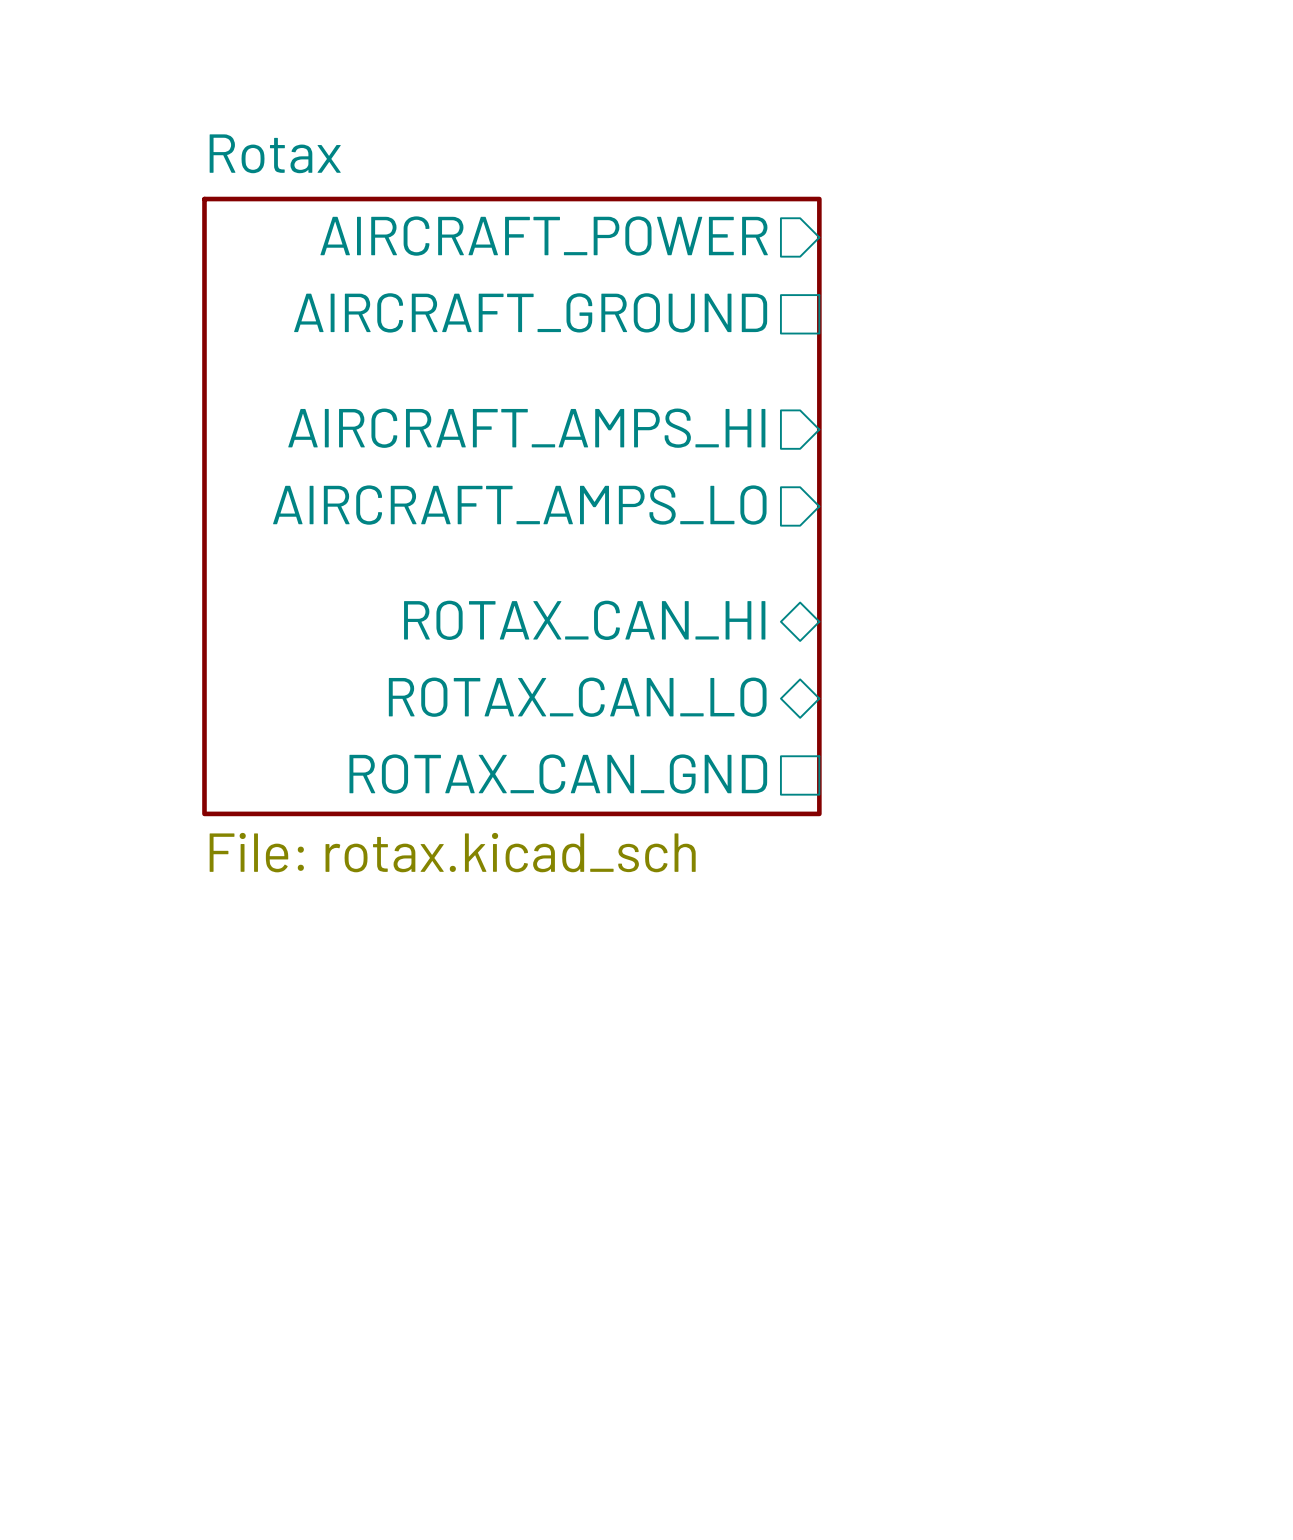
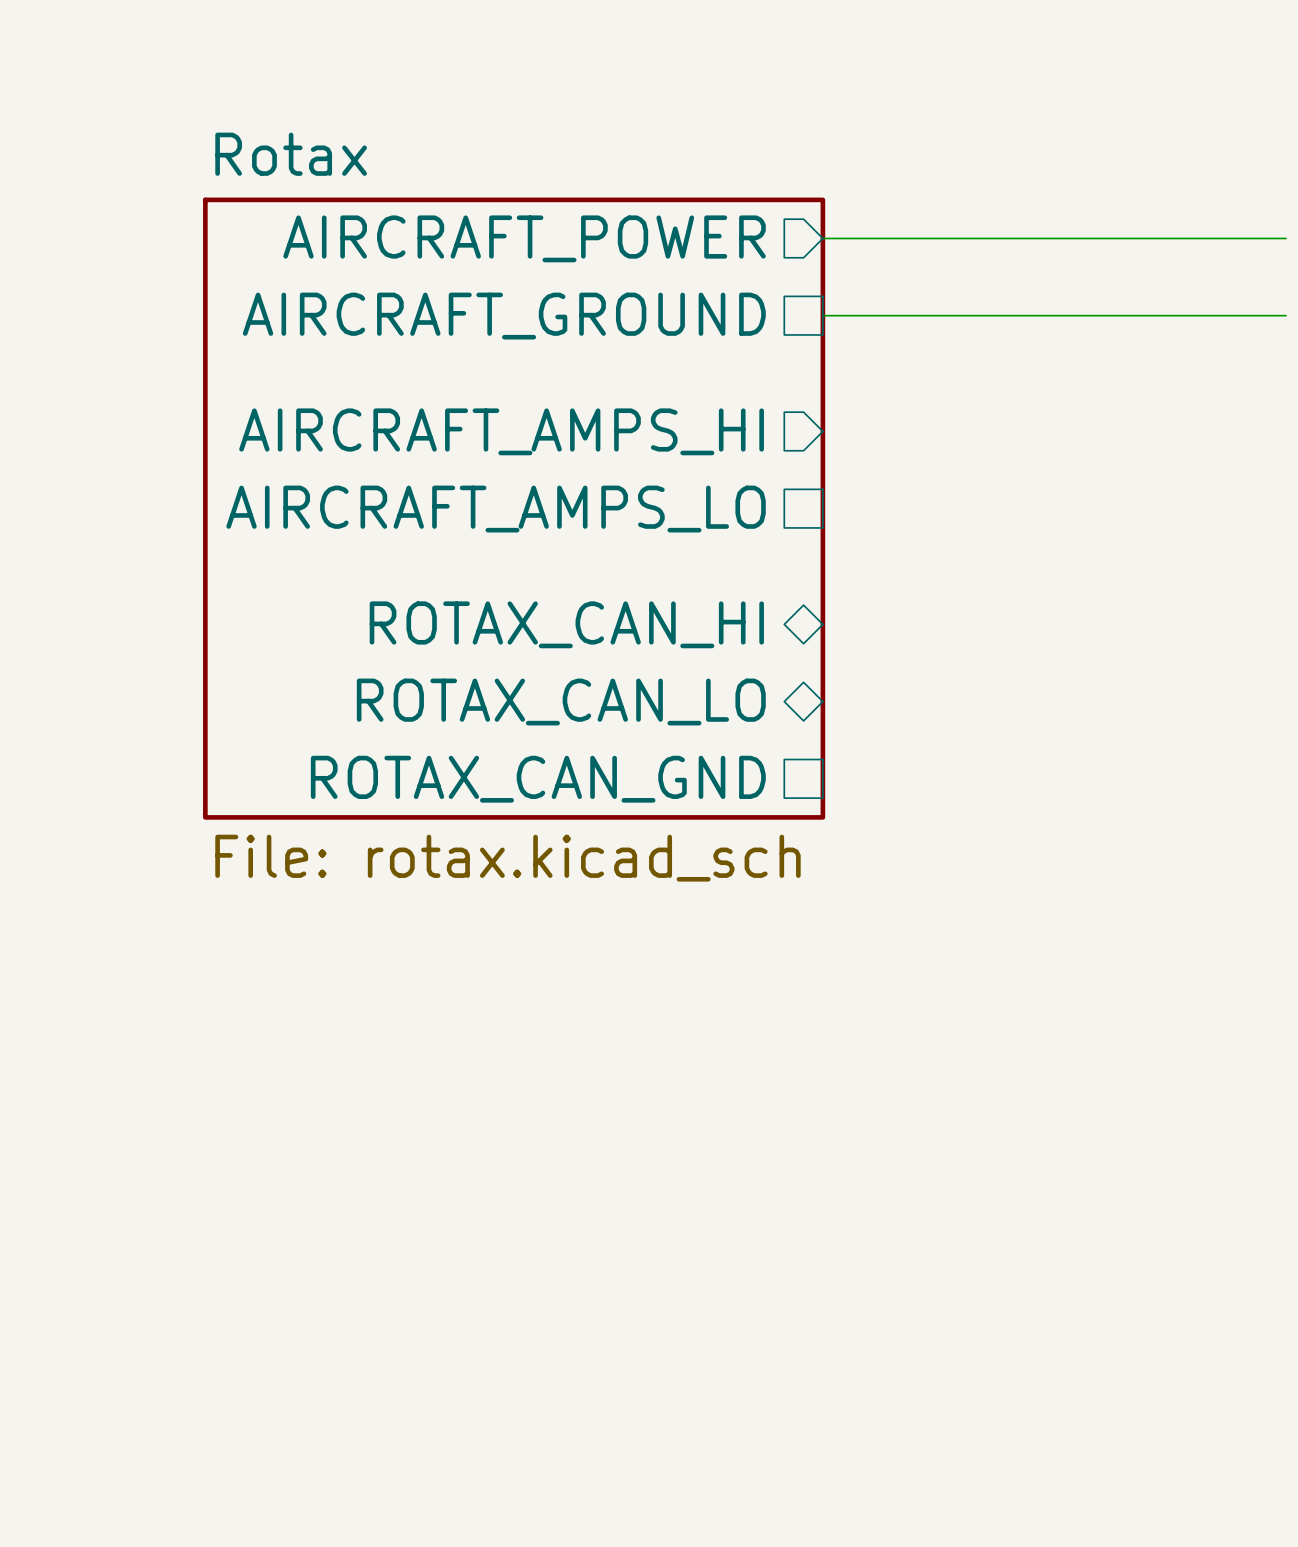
wire: none -> (822, 238) (1286, 238)
wire: none -> (822, 315) (1286, 315)
sheet pin shape: output (519, 505) -> passive (496, 509)

